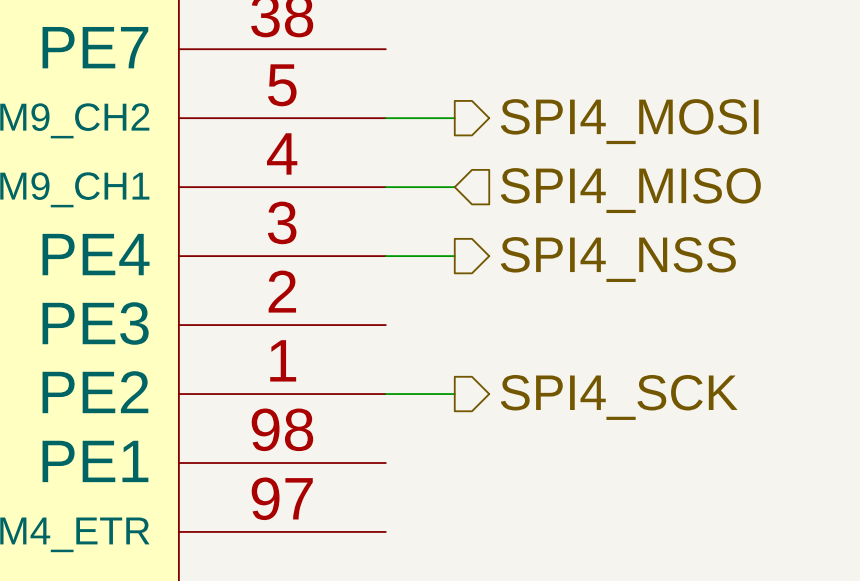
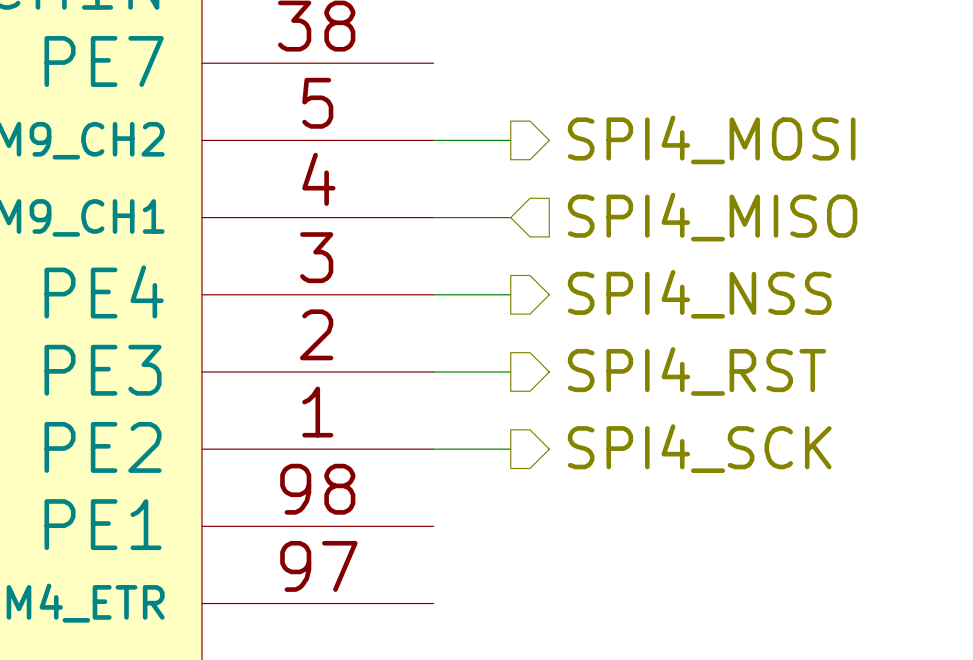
wire: none -> (433, 371) (510, 371)
hierarchical label: none -> SPI4_RST (696, 371)

